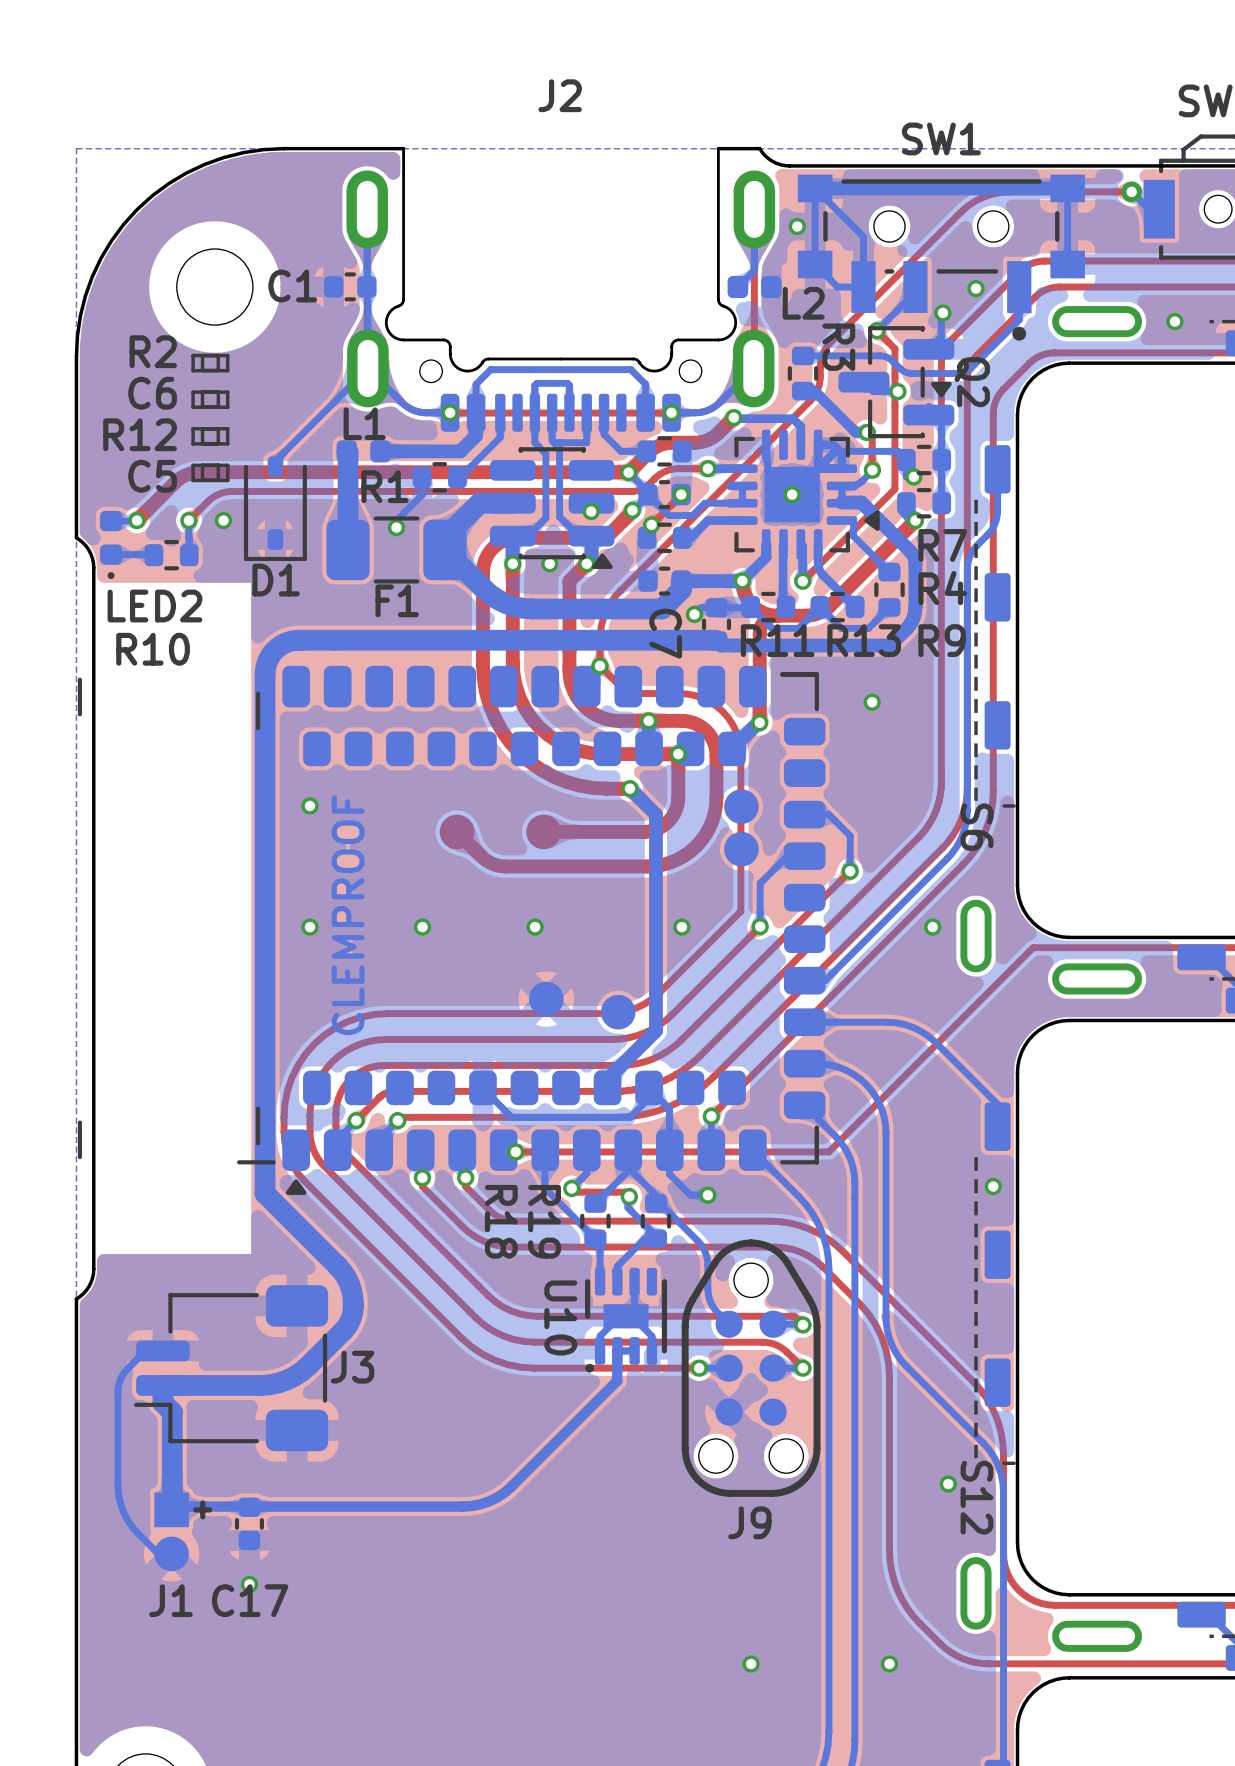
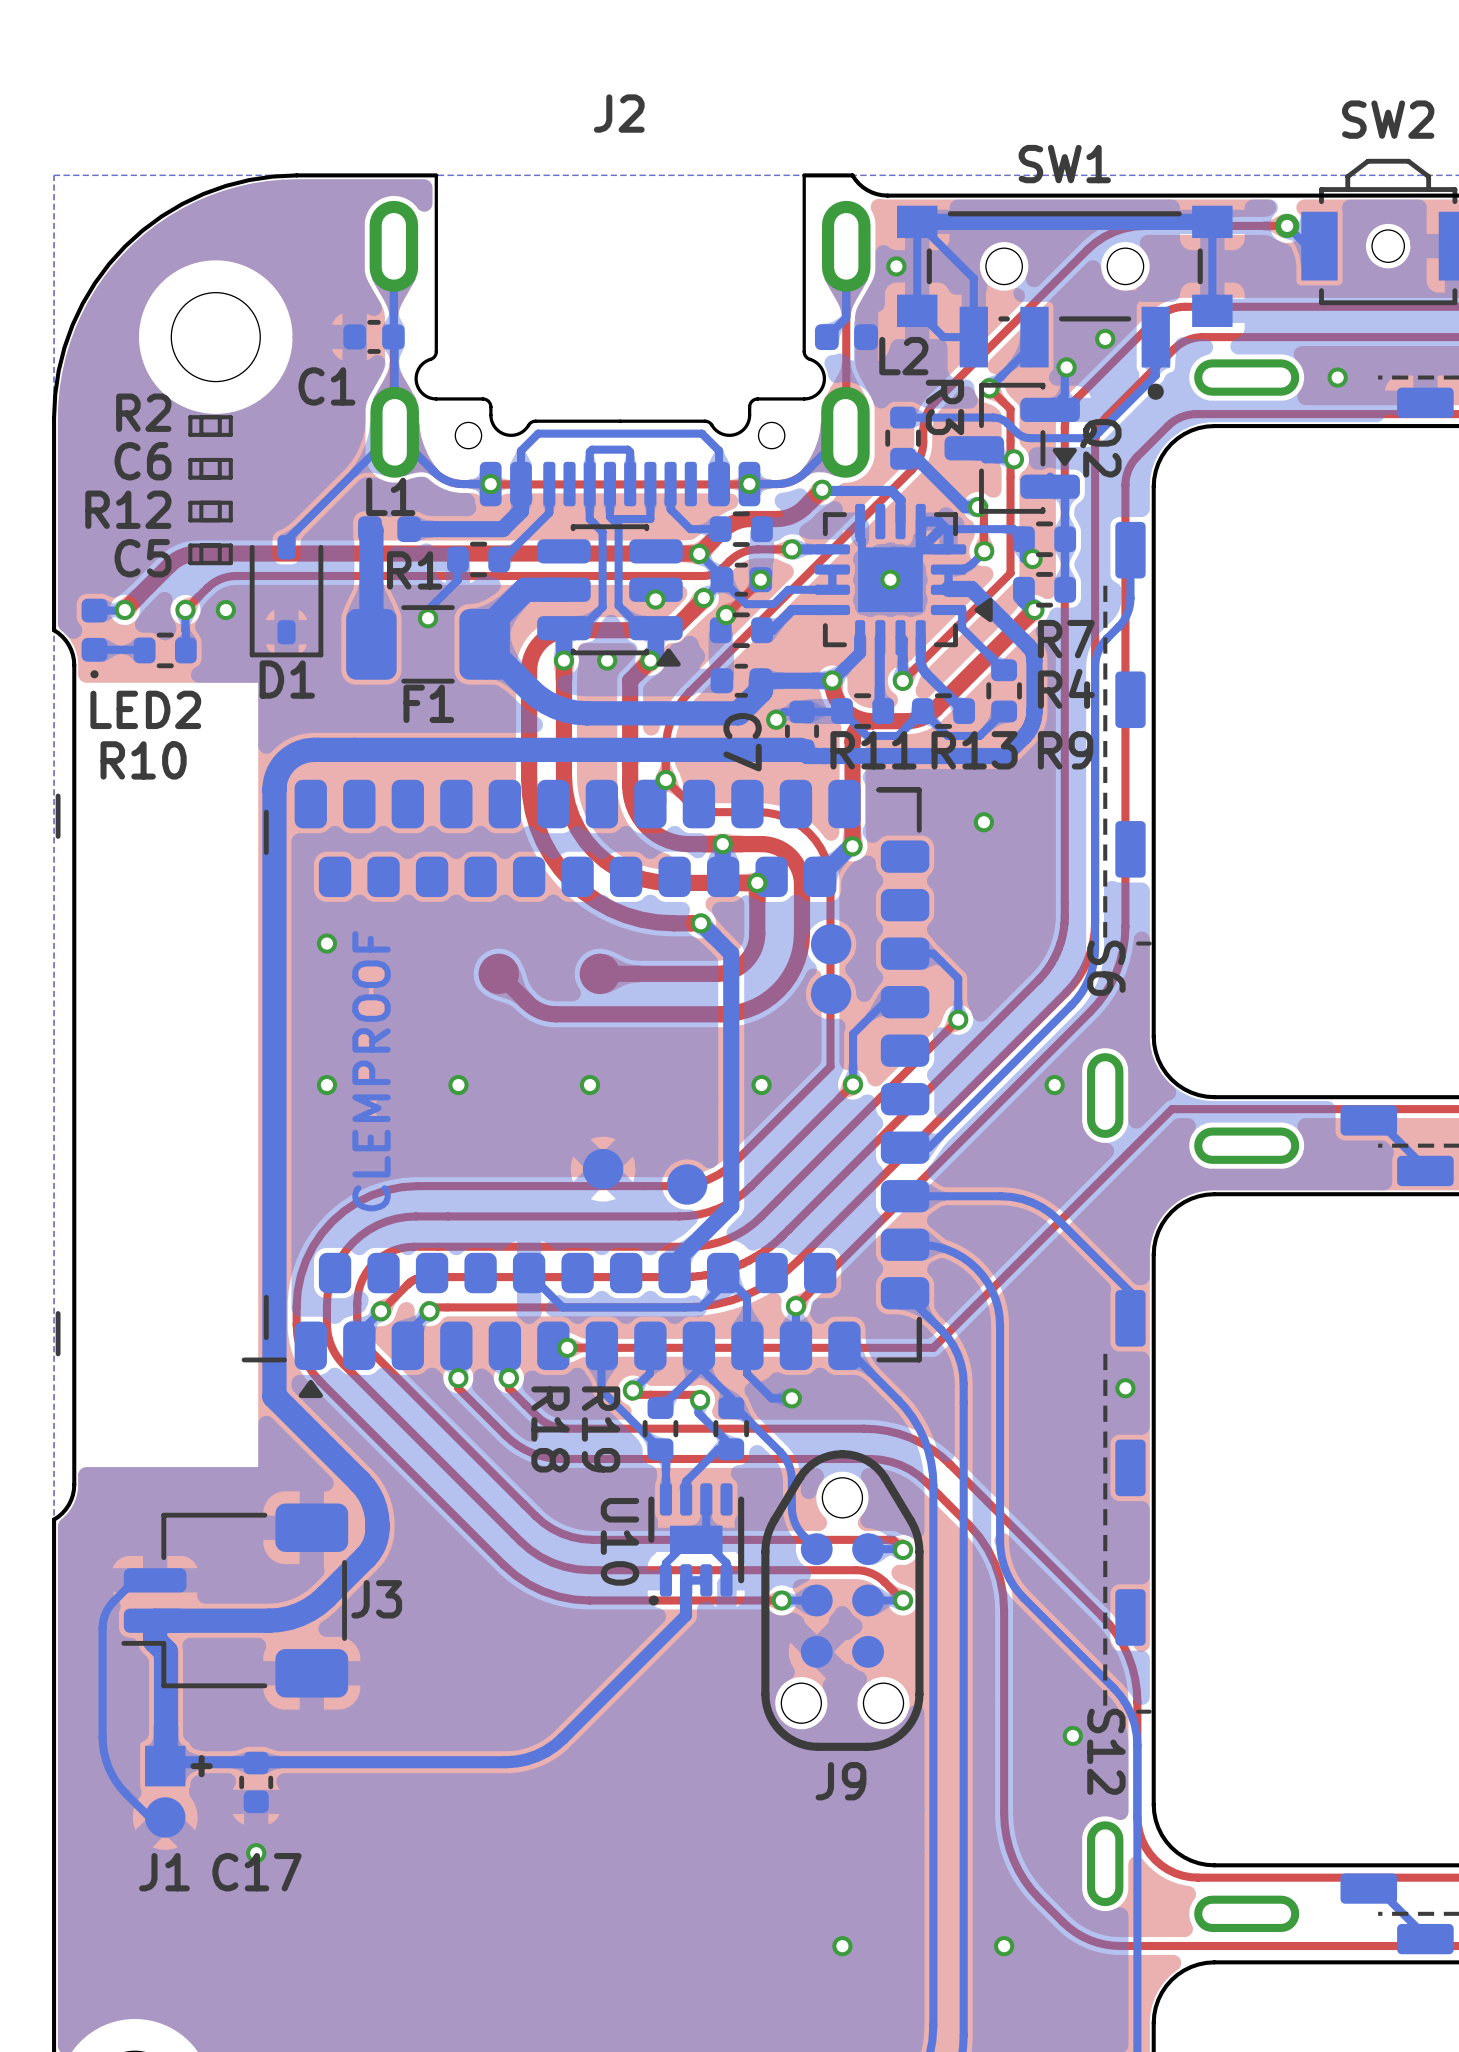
C1 name position: C1 (292, 285) -> C1 (326, 386)

